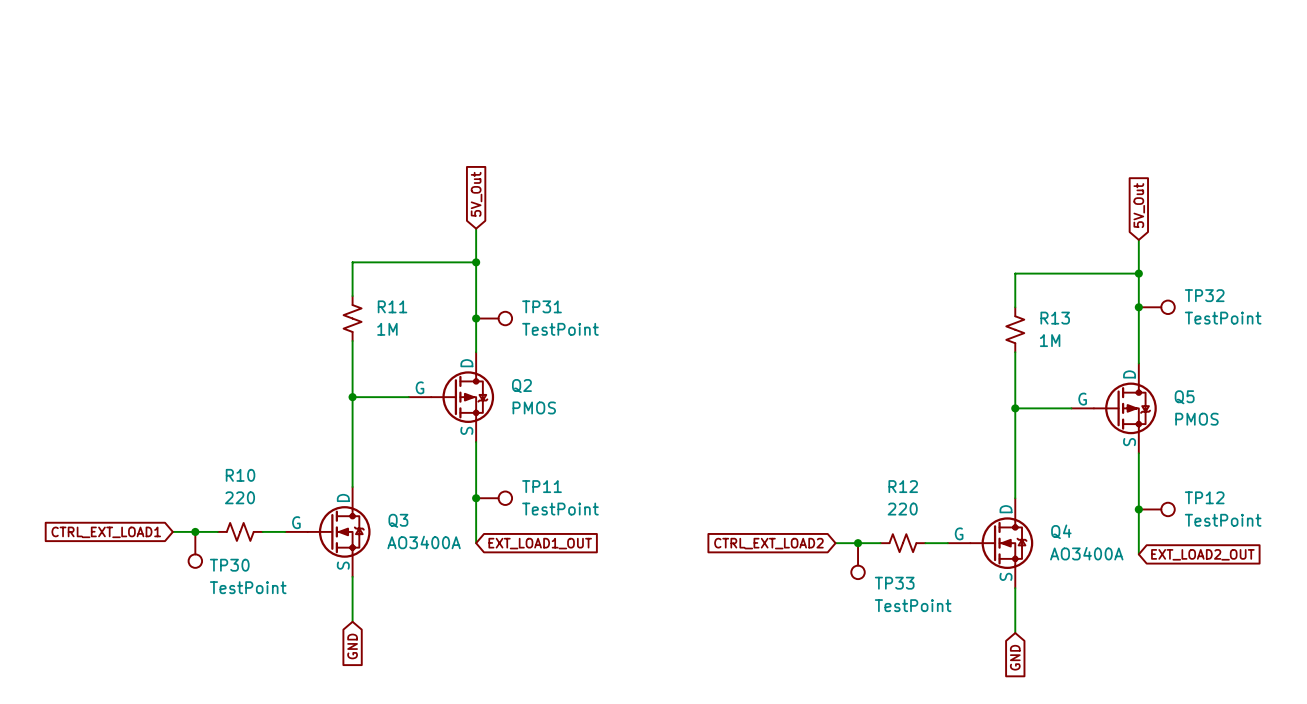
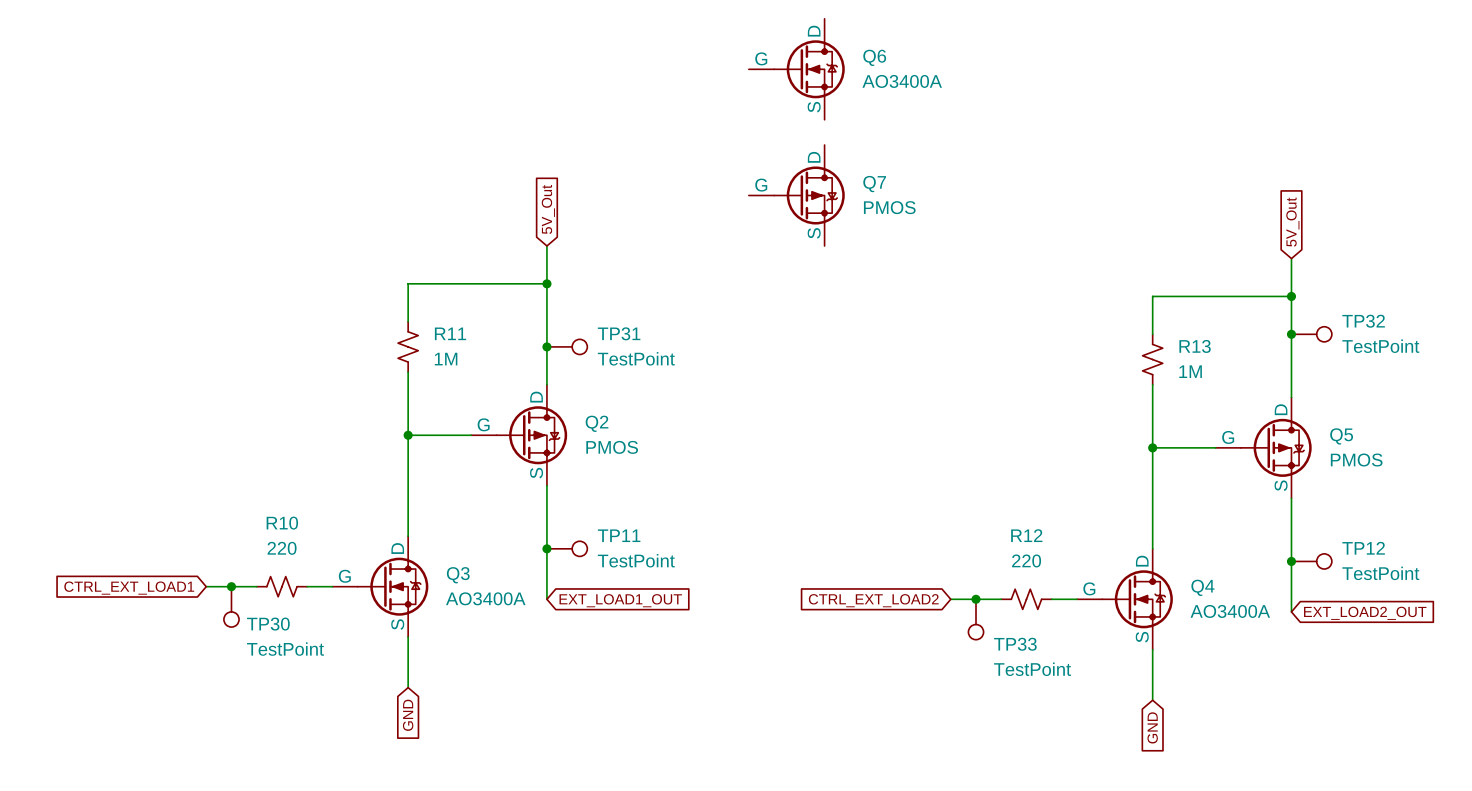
Q6: none -> AO3400A (796, 69)
Q7: none -> PMOS (796, 195)

